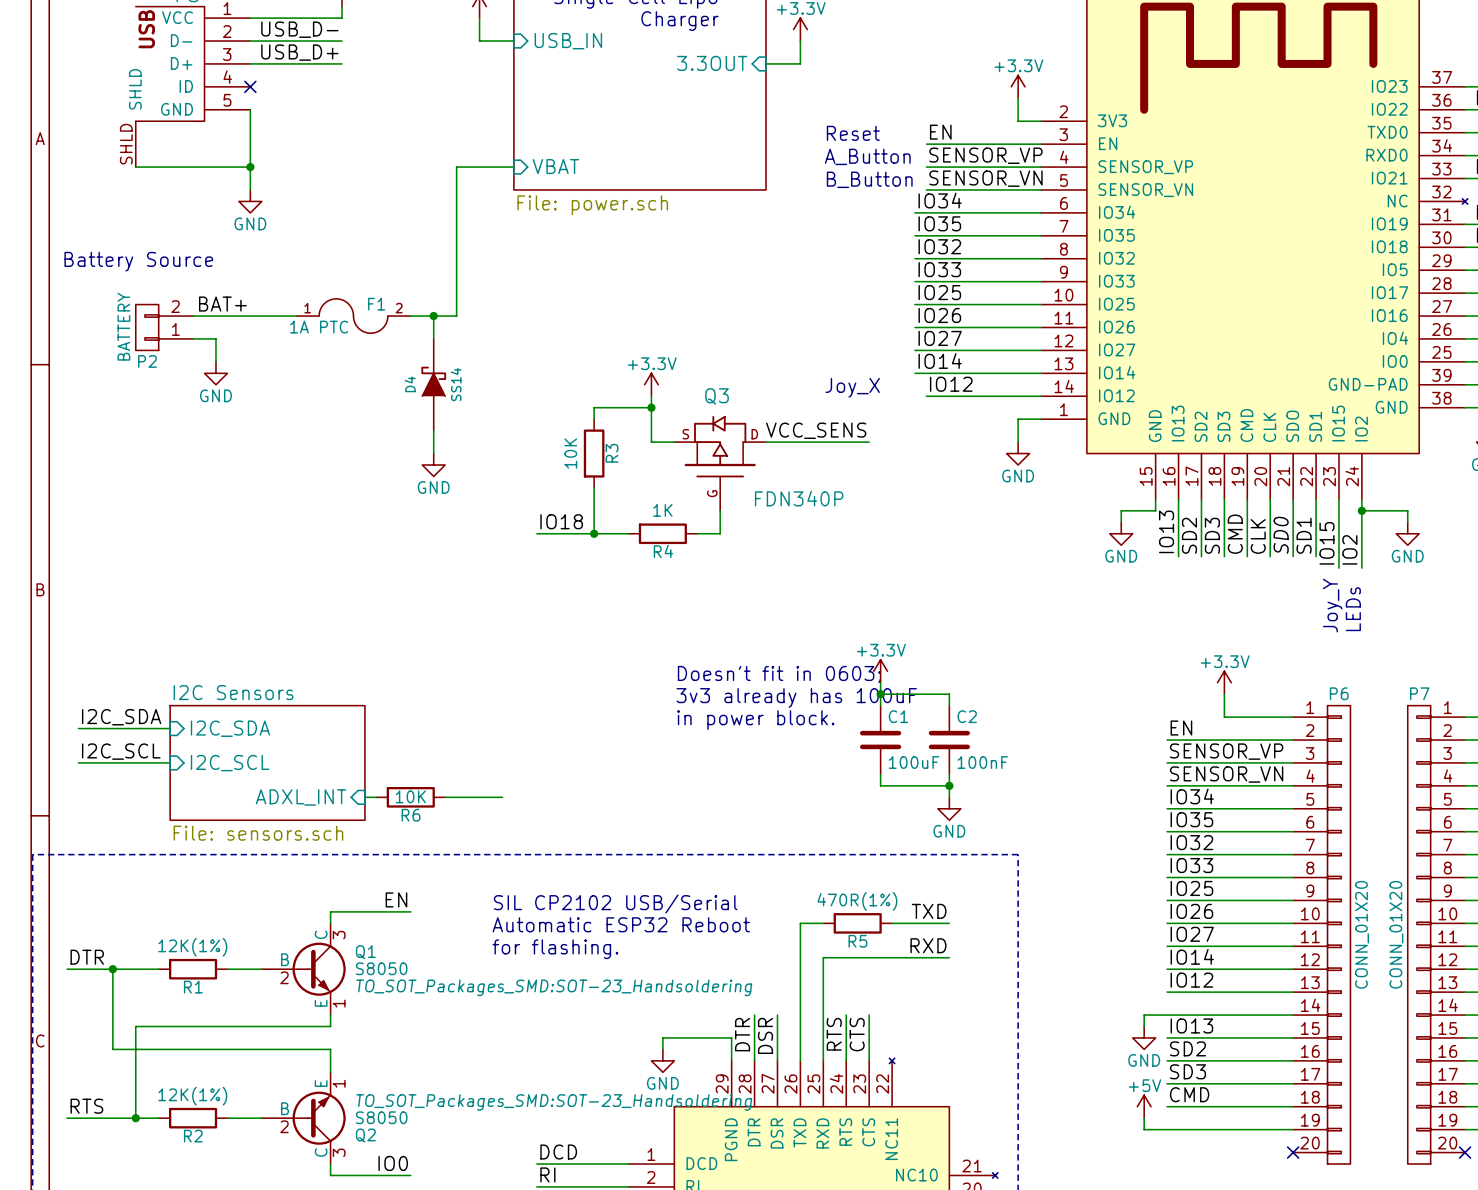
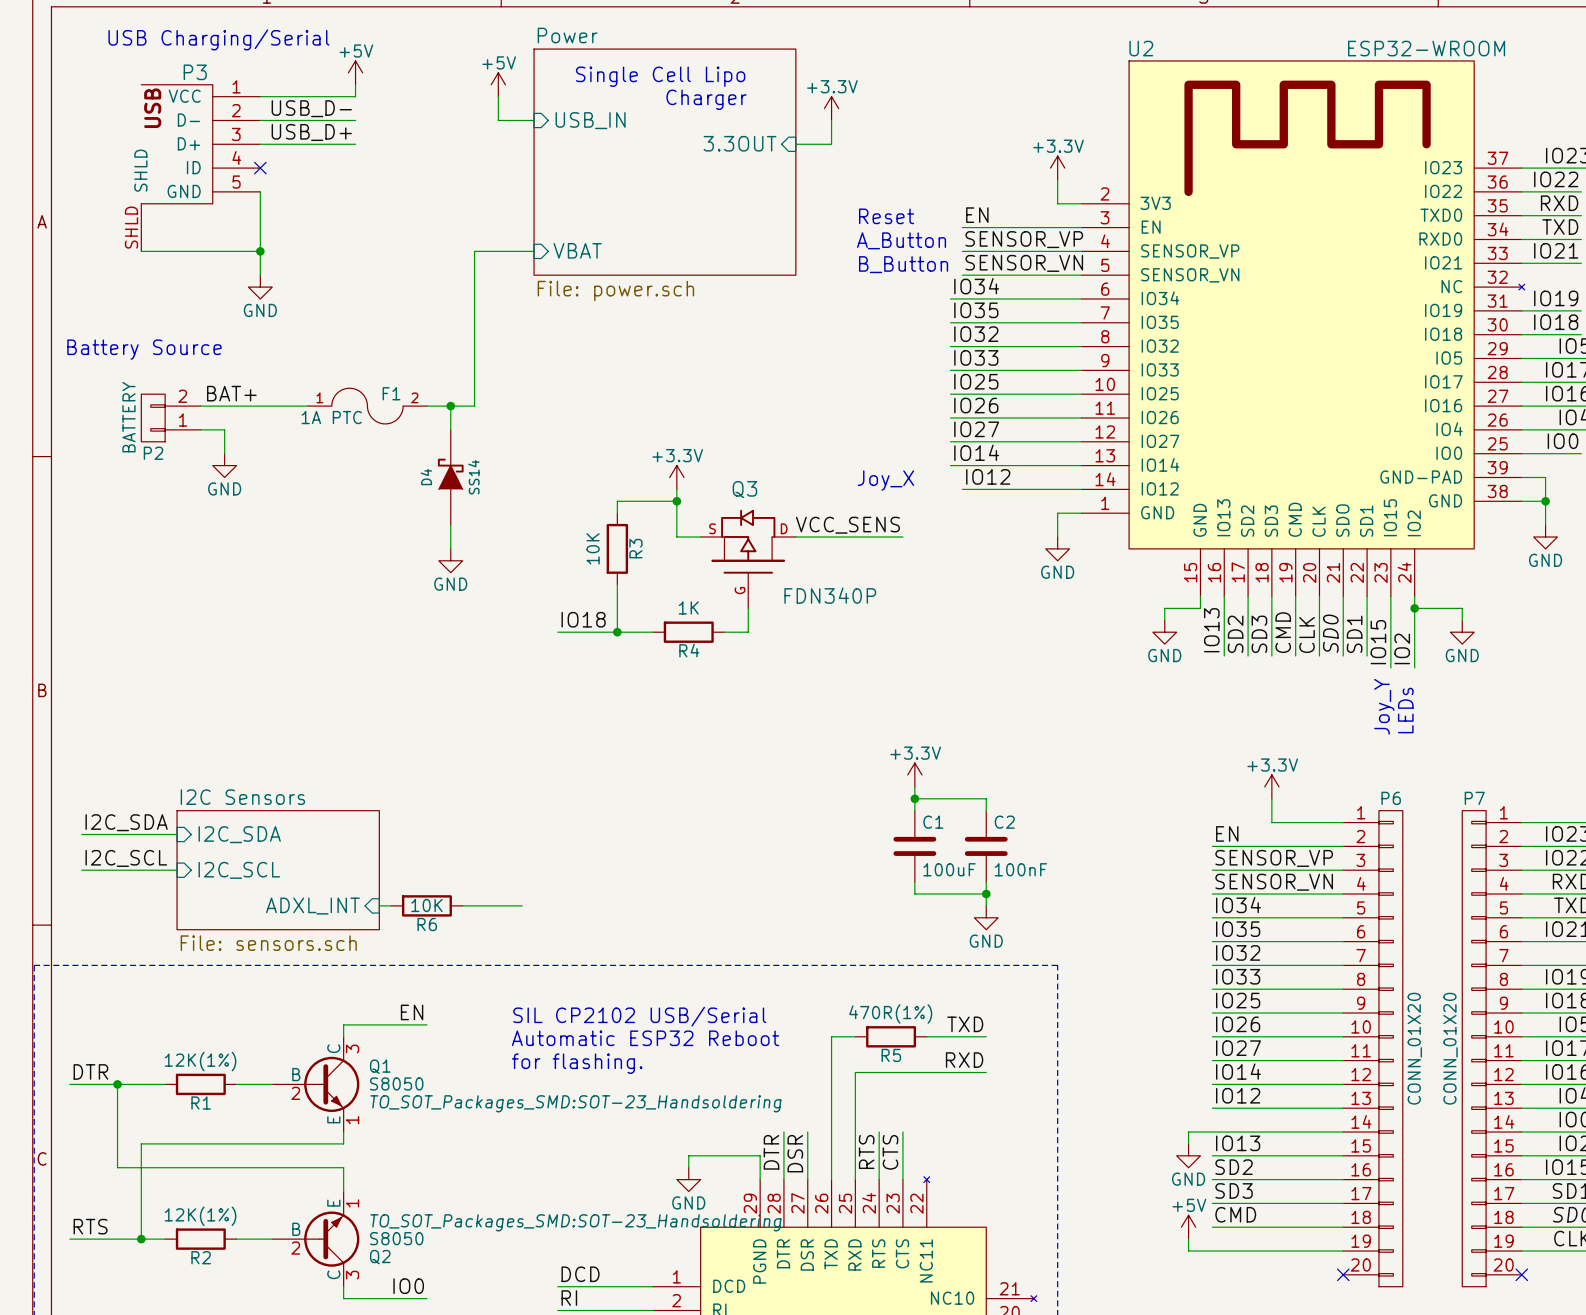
text: Doesn't fit in 0603; (779, 674) -> none
text: 3v3 already has 100uF (796, 697) -> none
text: in power block. (755, 720) -> none

